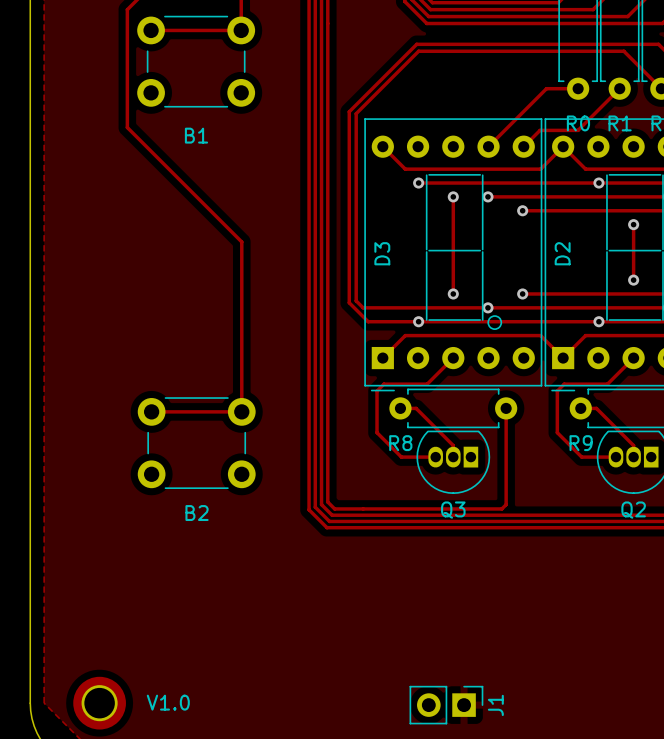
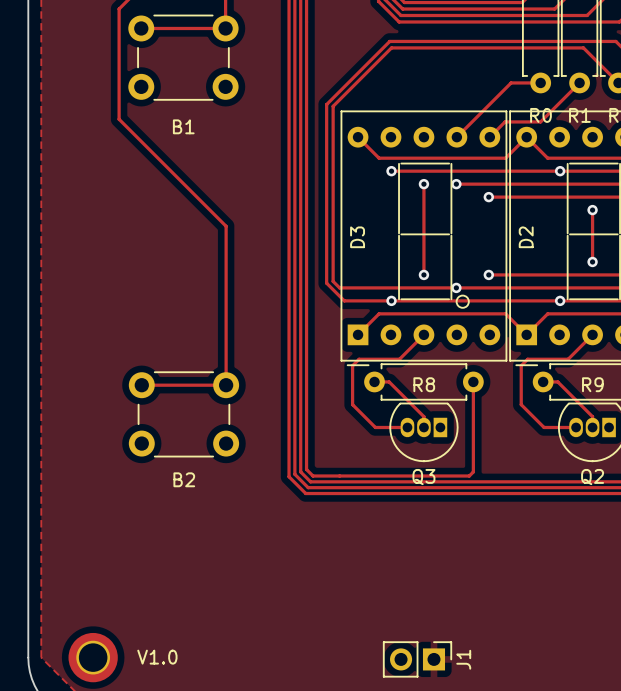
R8 name position: R8 (400, 443) -> R8 (424, 384)
R9 name position: R9 (581, 443) -> R9 (592, 384)

